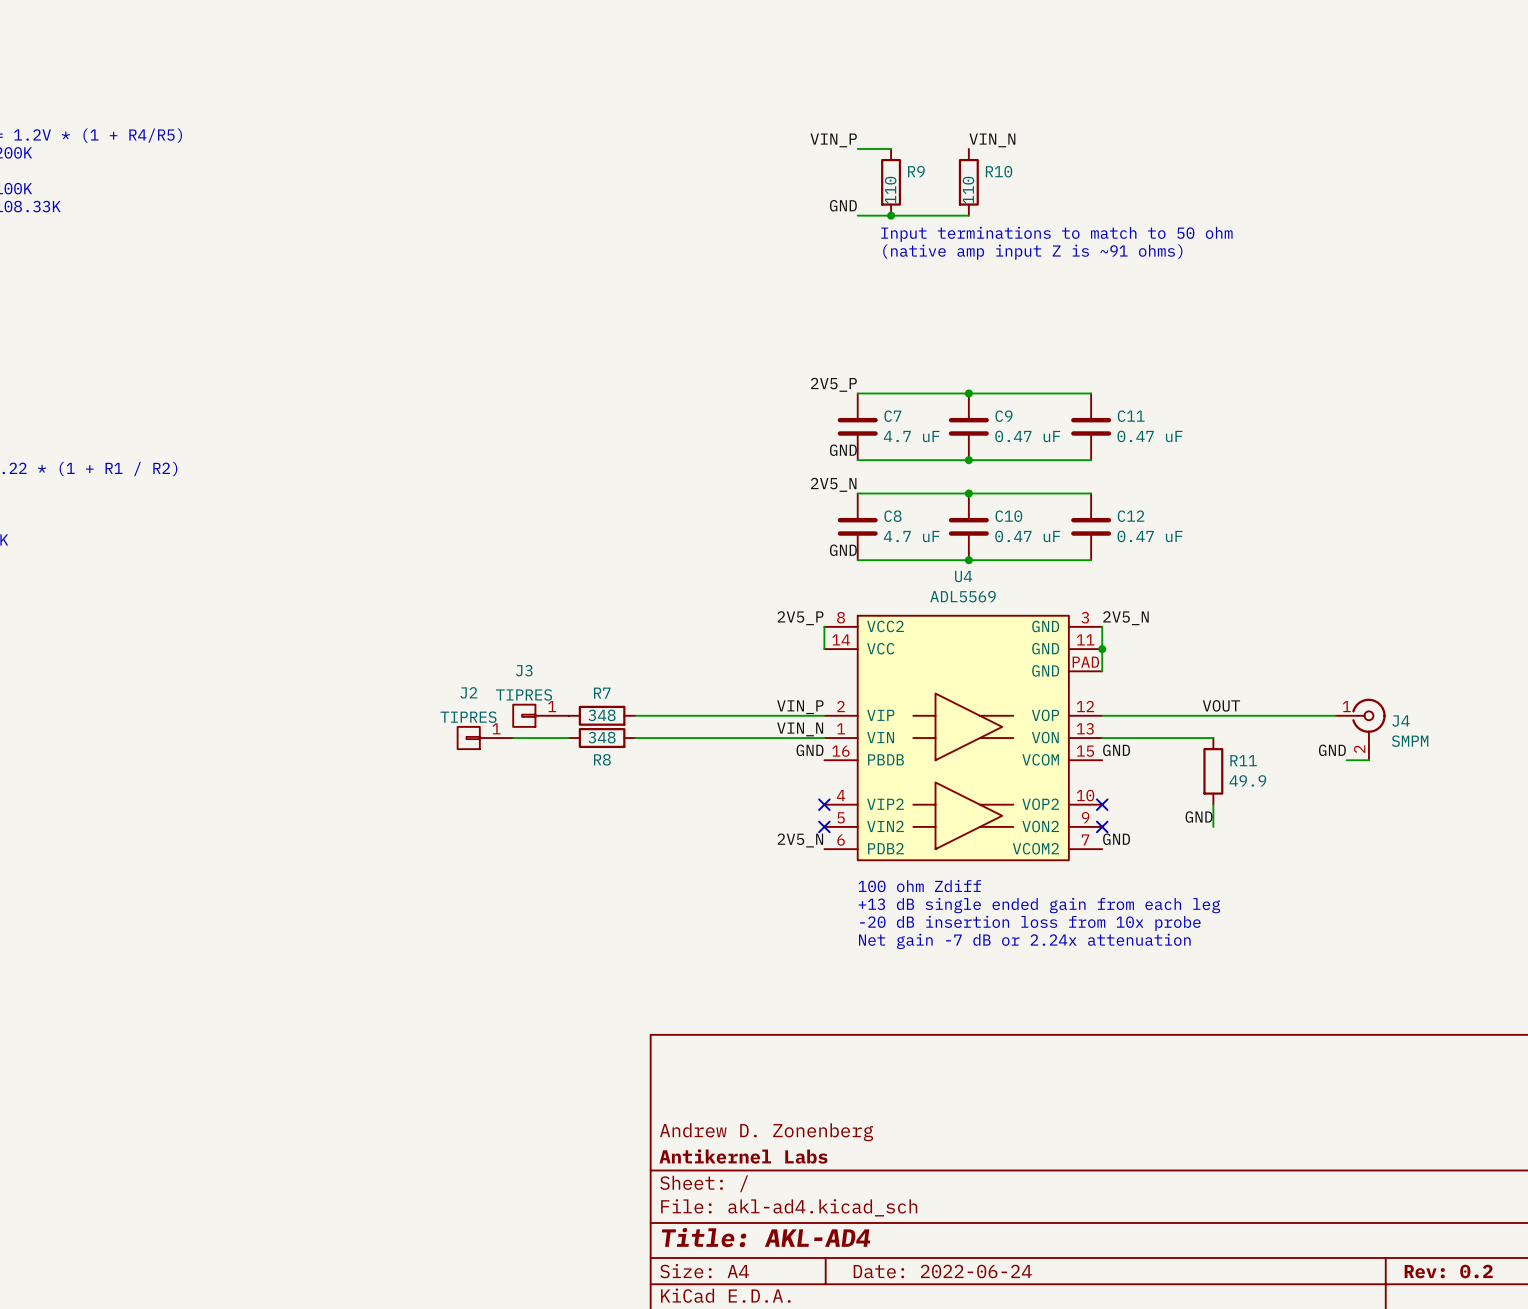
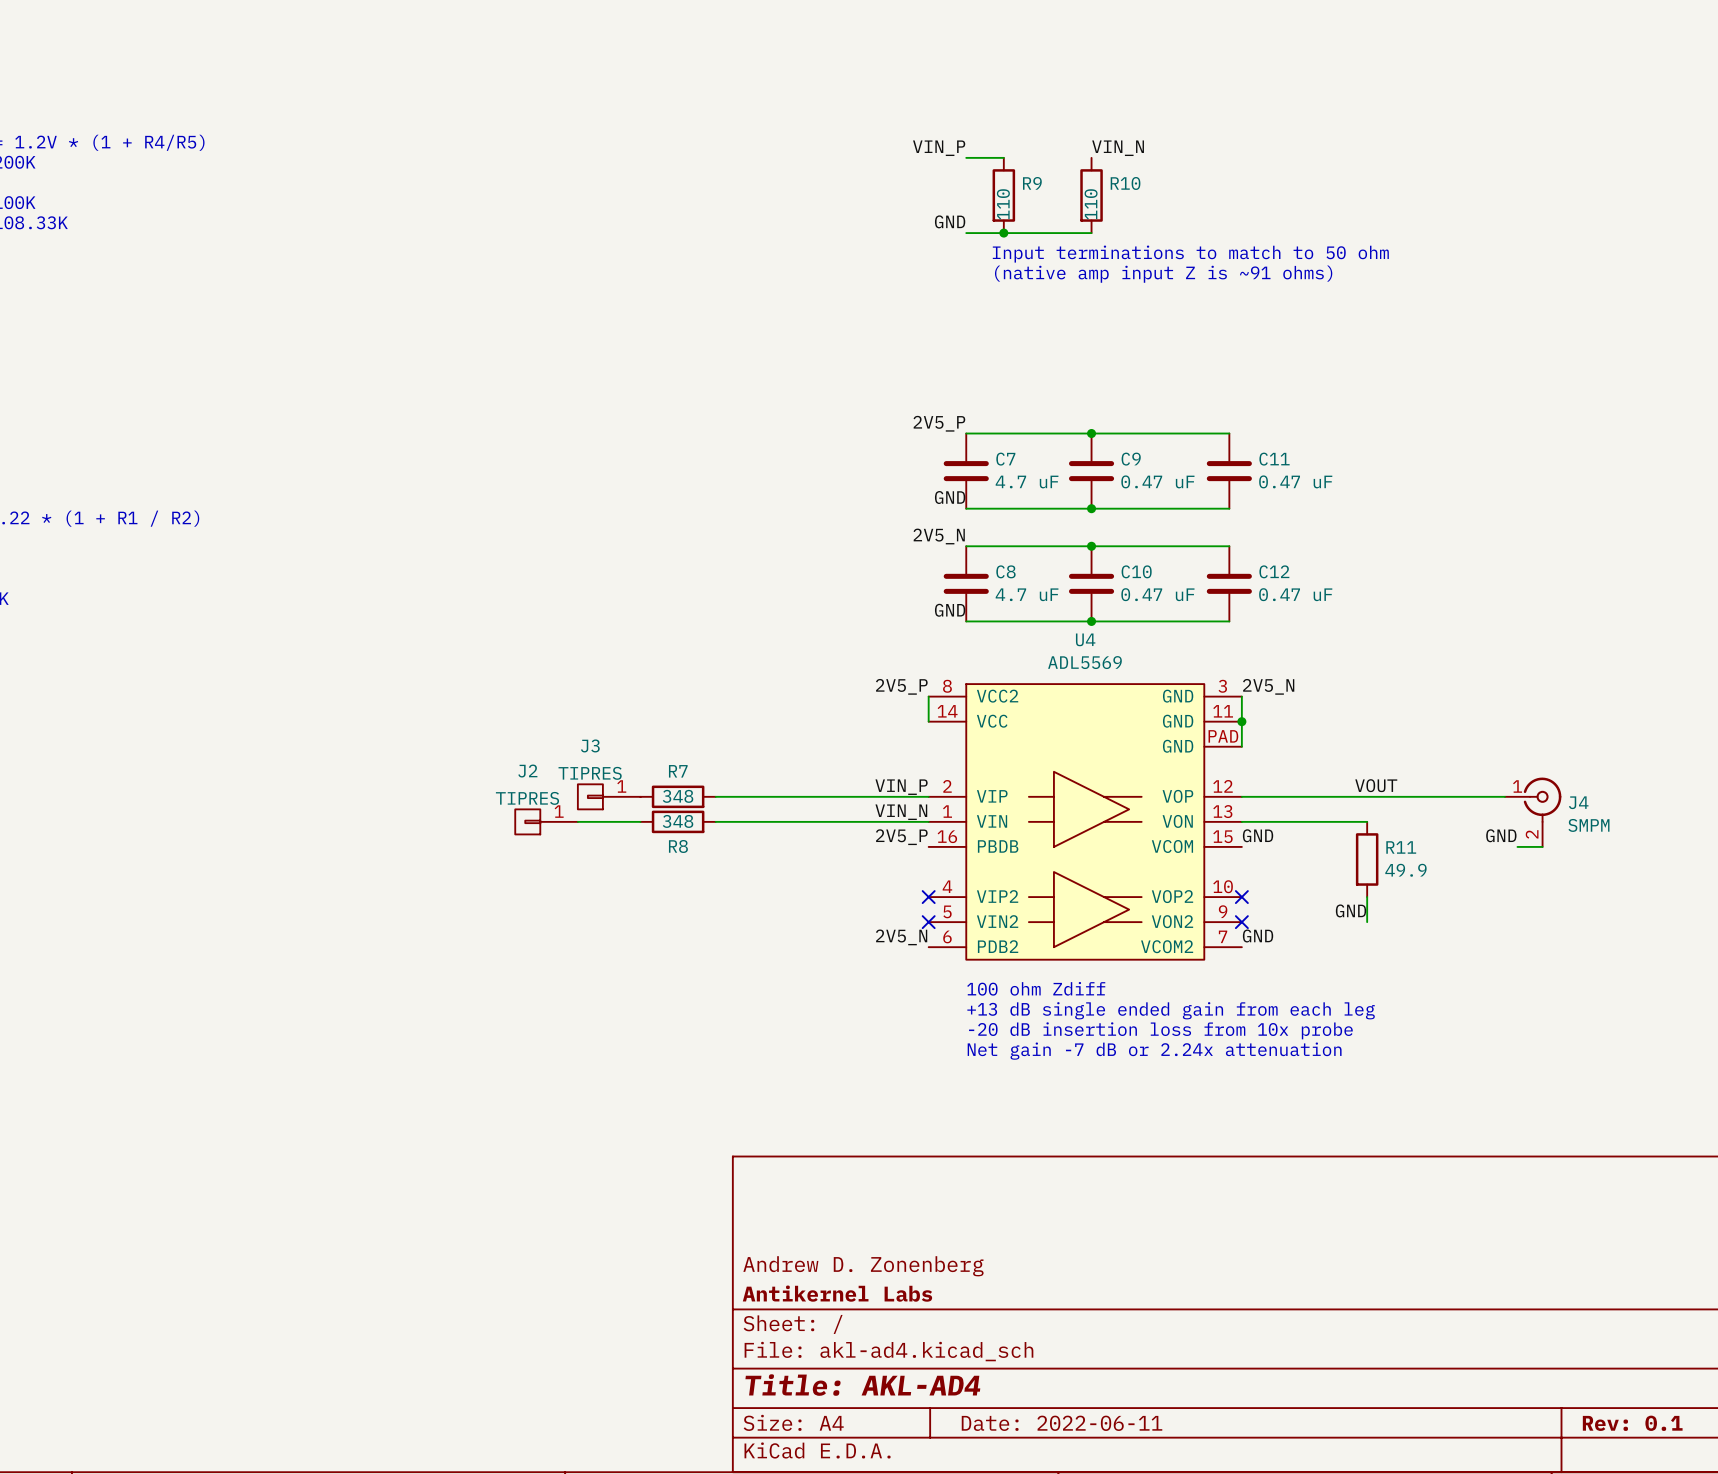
label: GND (810, 750) -> 2V5_P (901, 837)
title block: Date: 2022-06-24 (942, 1271) -> Date: 2022-06-11 (1062, 1423)
title block: Rev: 0.2 (1448, 1271) -> Rev: 0.1 (1632, 1423)

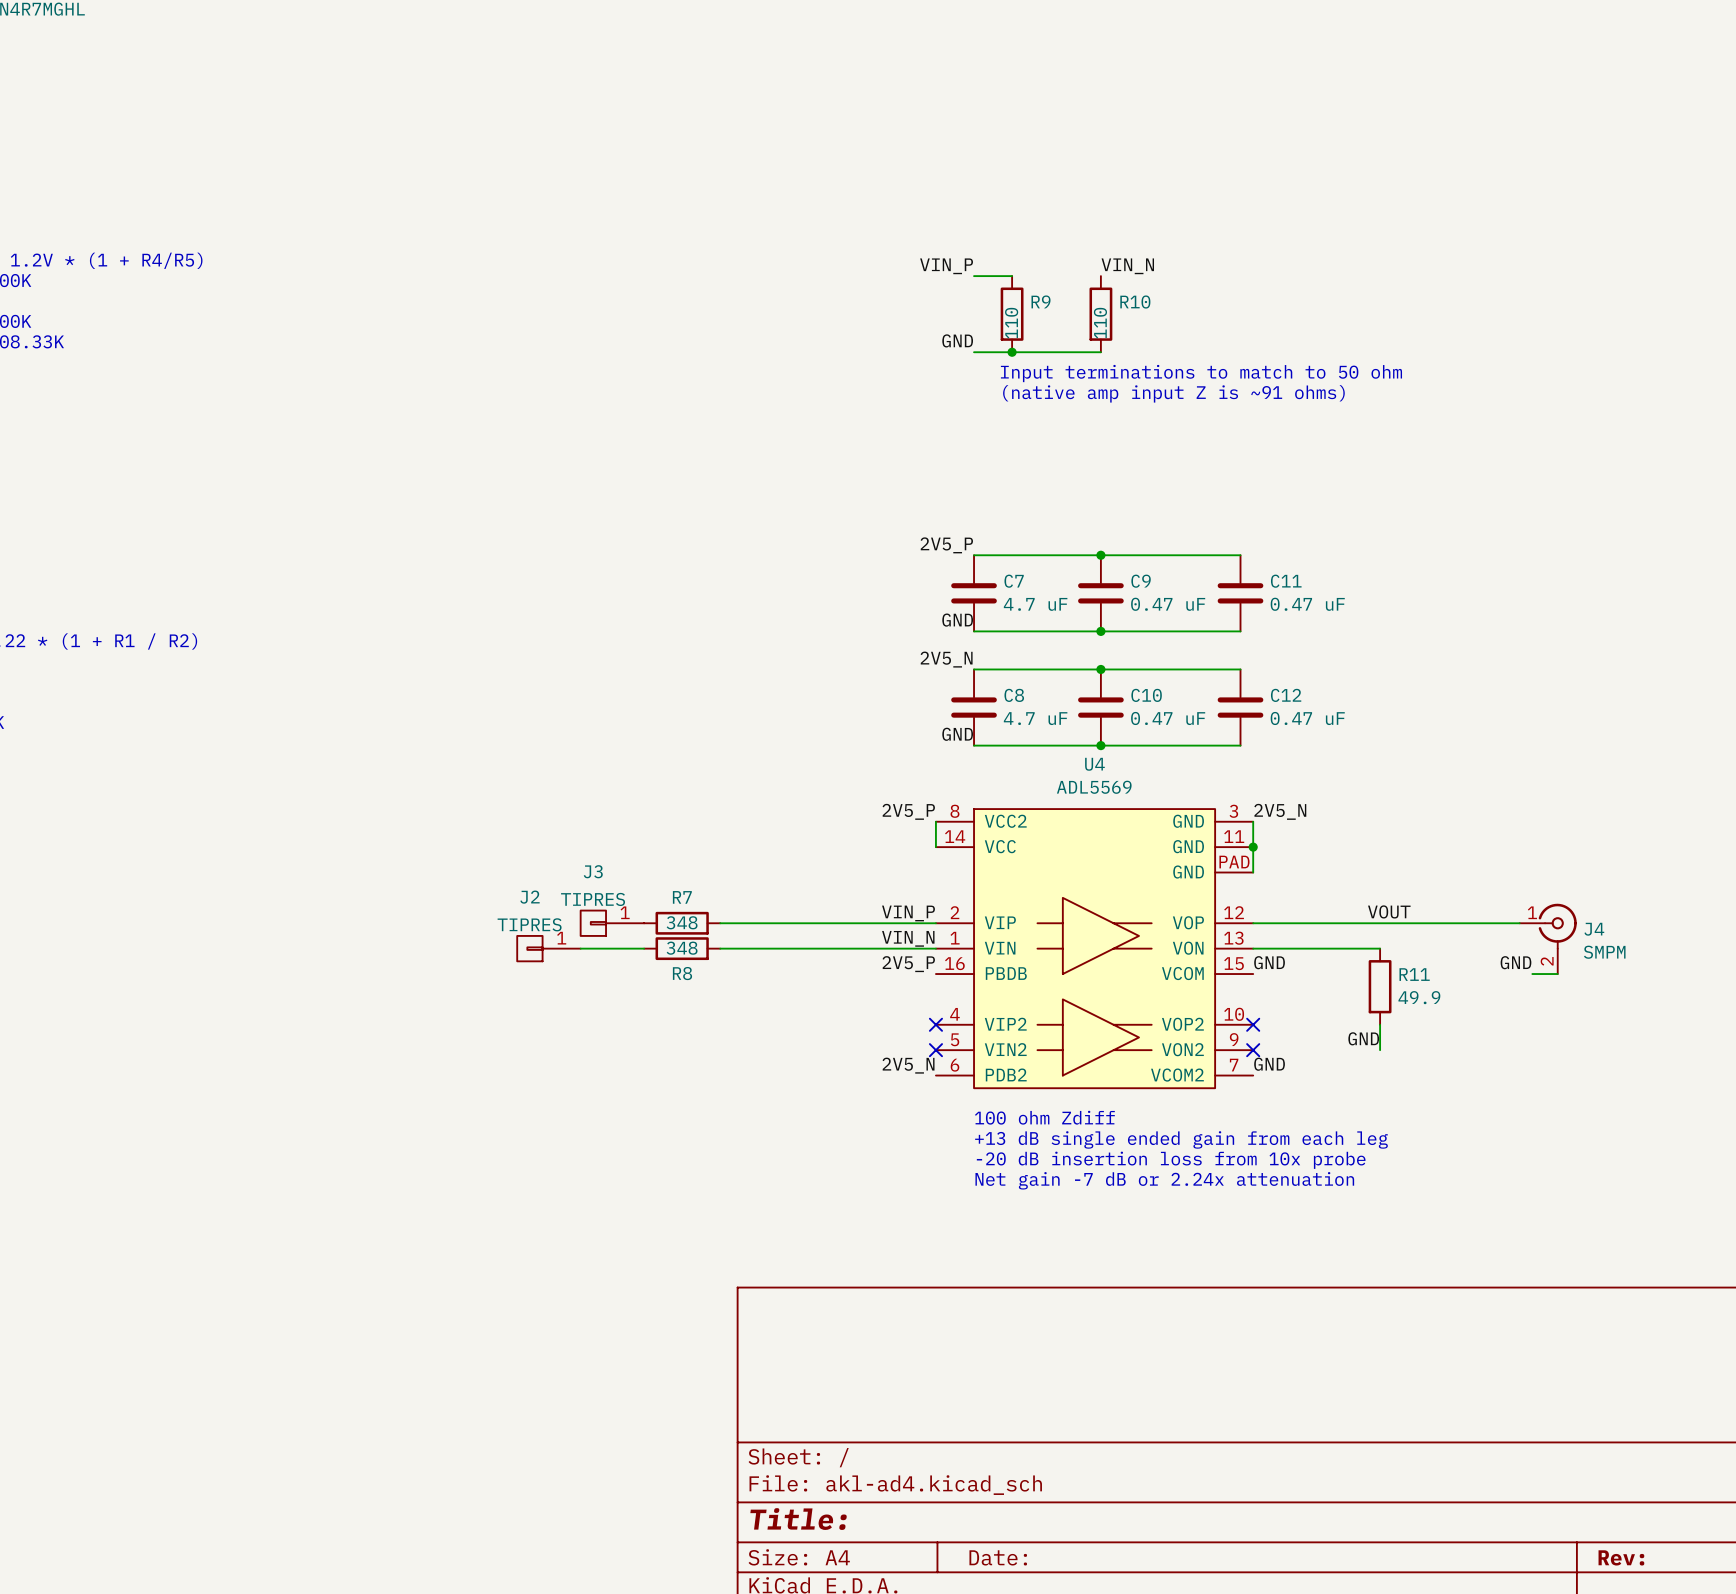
title block: Andrew D. Zonenberg (863, 1266) -> none
title block: Antikernel Labs (837, 1293) -> none
title block: Title: AKL-AD4 (862, 1385) -> Title: (798, 1519)
title block: Date: 2022-06-11 (1062, 1423) -> Date: (998, 1557)
title block: Rev: 0.1 (1632, 1423) -> Rev: (1621, 1557)

